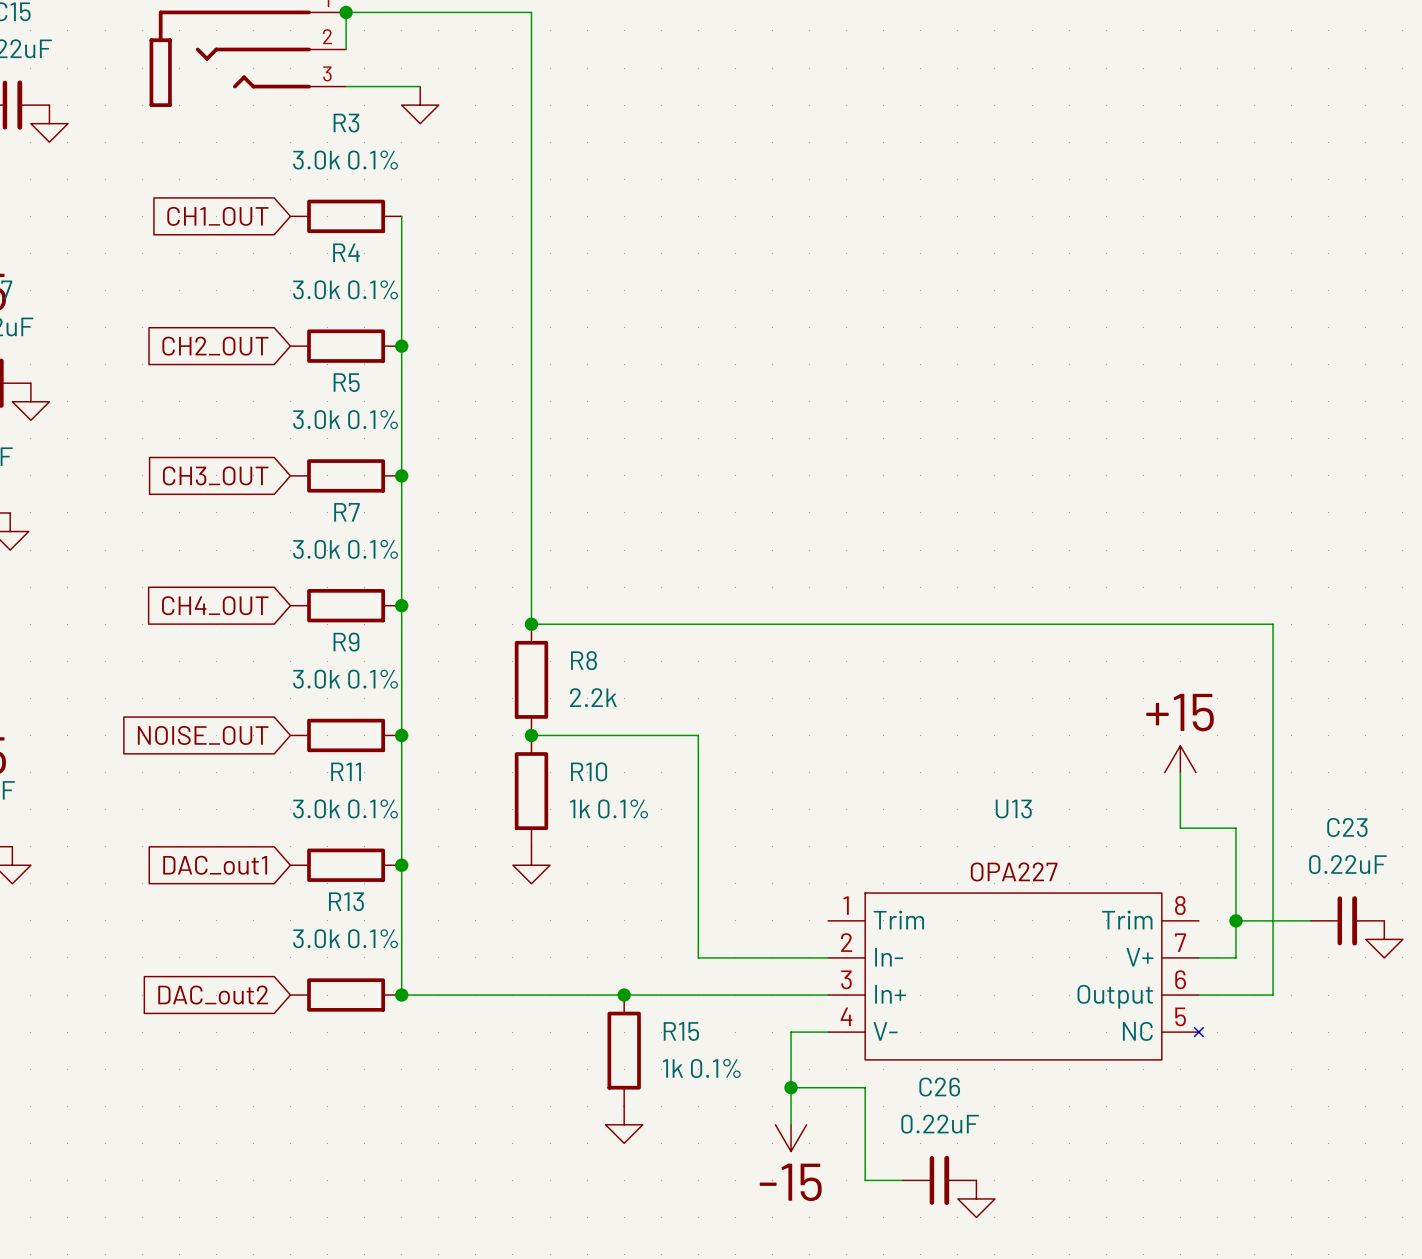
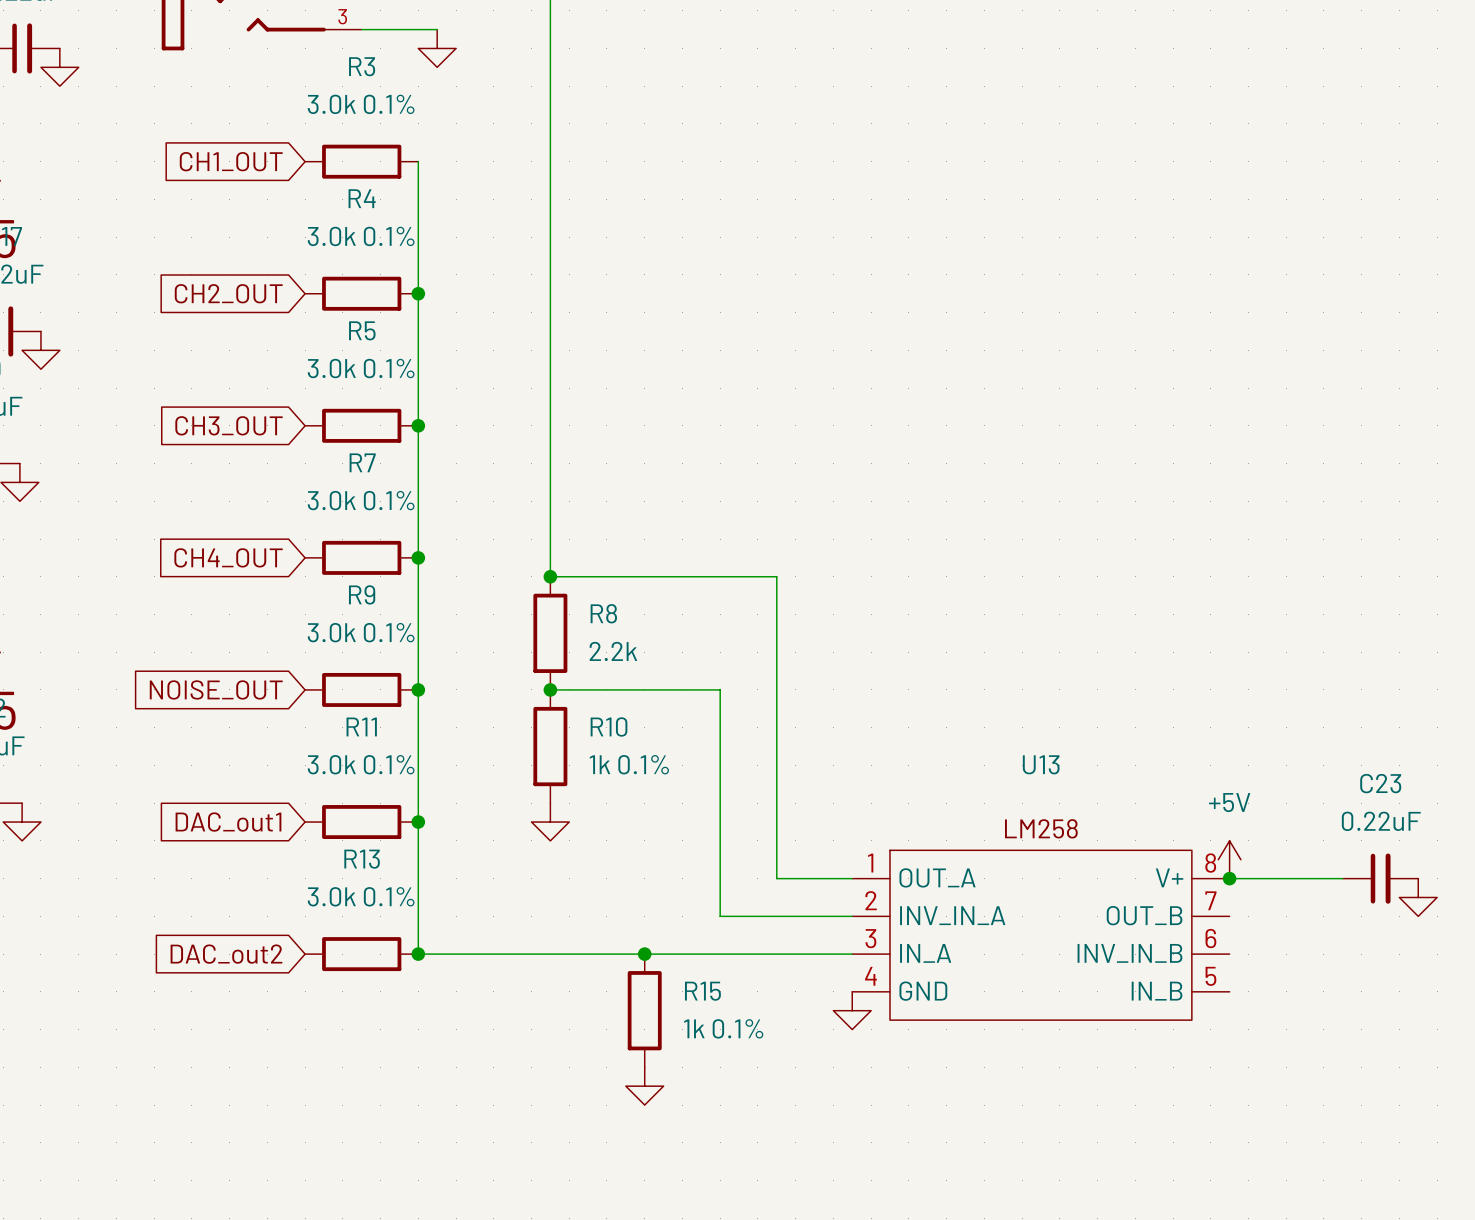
wire: (753, 624) (1273, 624) (1273, 995) (1198, 995) -> (776, 576) (776, 878) (852, 878)
power symbol: (1180, 759) -> none
wire: (1180, 772) (1180, 828) (1235, 828) (1235, 957) (1198, 957) -> none
U13 symbol: [828, 893, 1204, 1060] -> [852, 850, 1230, 1021]
power symbol: none -> +5V (1229, 859)
wire: none -> (1229, 878) (1267, 878)
junction position: (1235, 920) -> (1229, 878)
wire: (828, 1032) (791, 1032) (791, 1124) -> none
wire: (791, 1087) (865, 1087) (865, 1180) (902, 1180) -> none
junction: (791, 1087) -> none
power symbol: (791, 1138) -> none
C26: (939, 1180) -> none
power symbol position: (976, 1198) -> (852, 1010)

